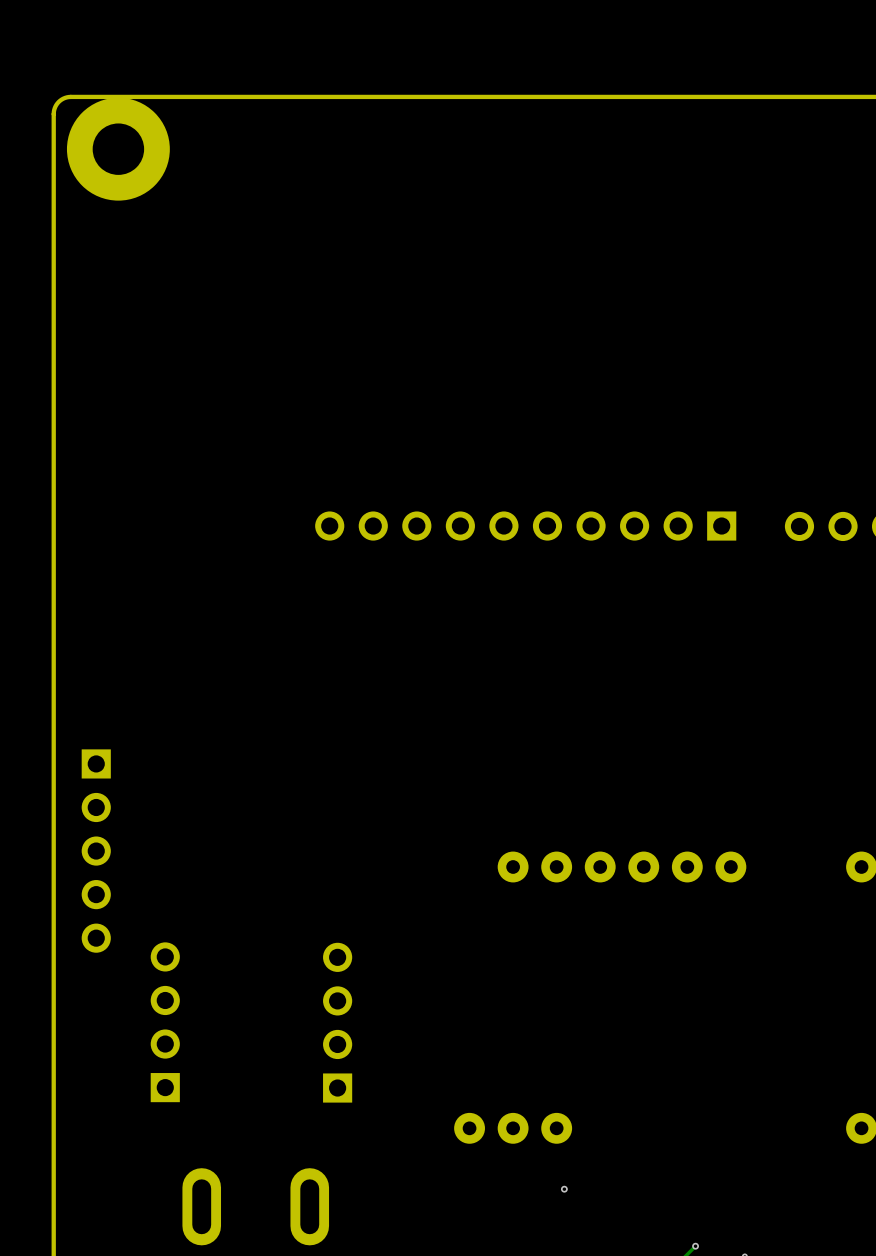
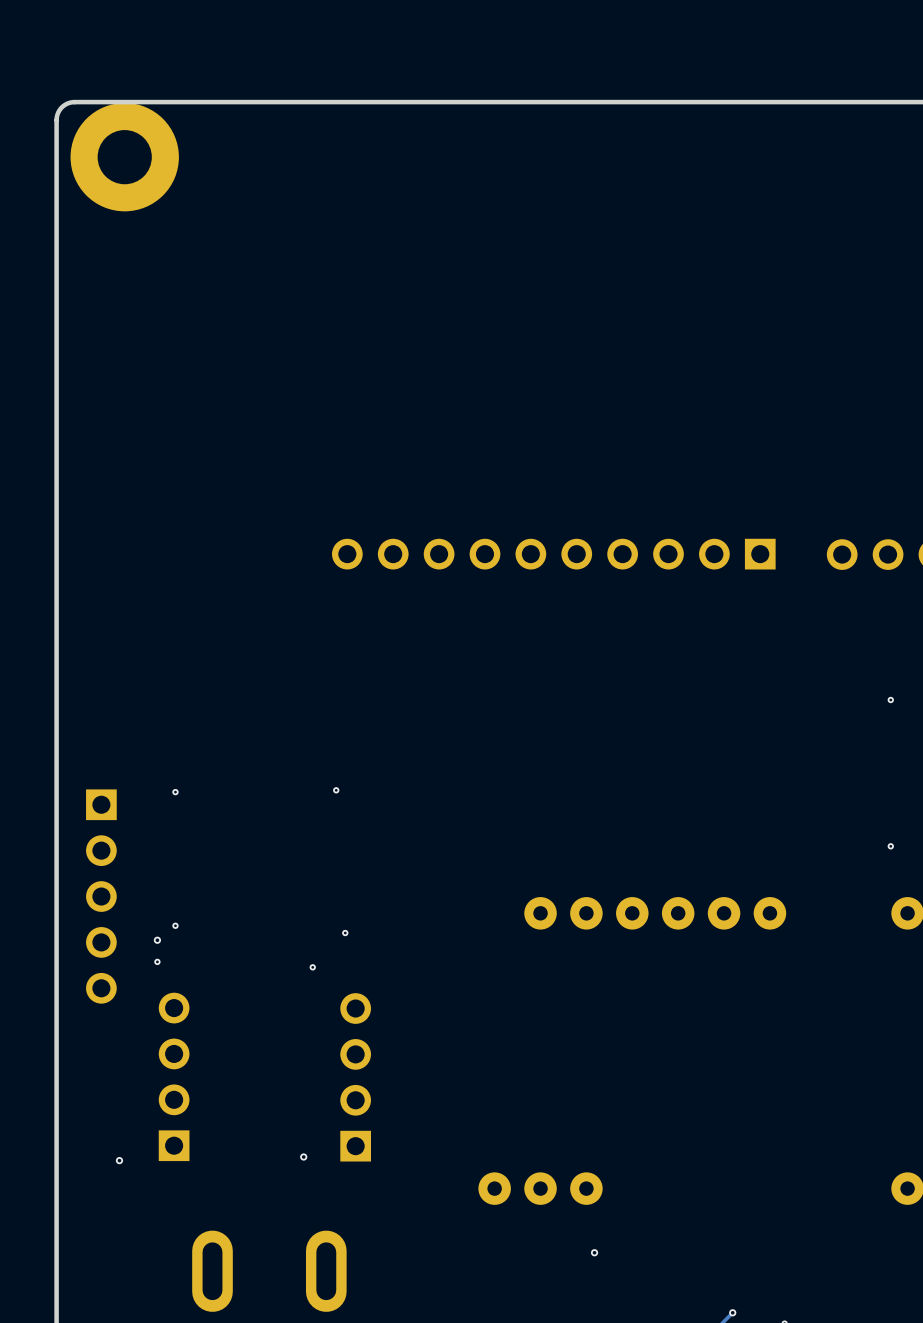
via: none -> (890, 699)
via: none -> (336, 790)
via: none -> (175, 792)
via: none -> (890, 846)
via: none -> (175, 925)
via: none -> (345, 933)
via: none -> (157, 940)
via: none -> (157, 961)
via: none -> (312, 967)
via: none -> (303, 1157)
via: none -> (119, 1160)

